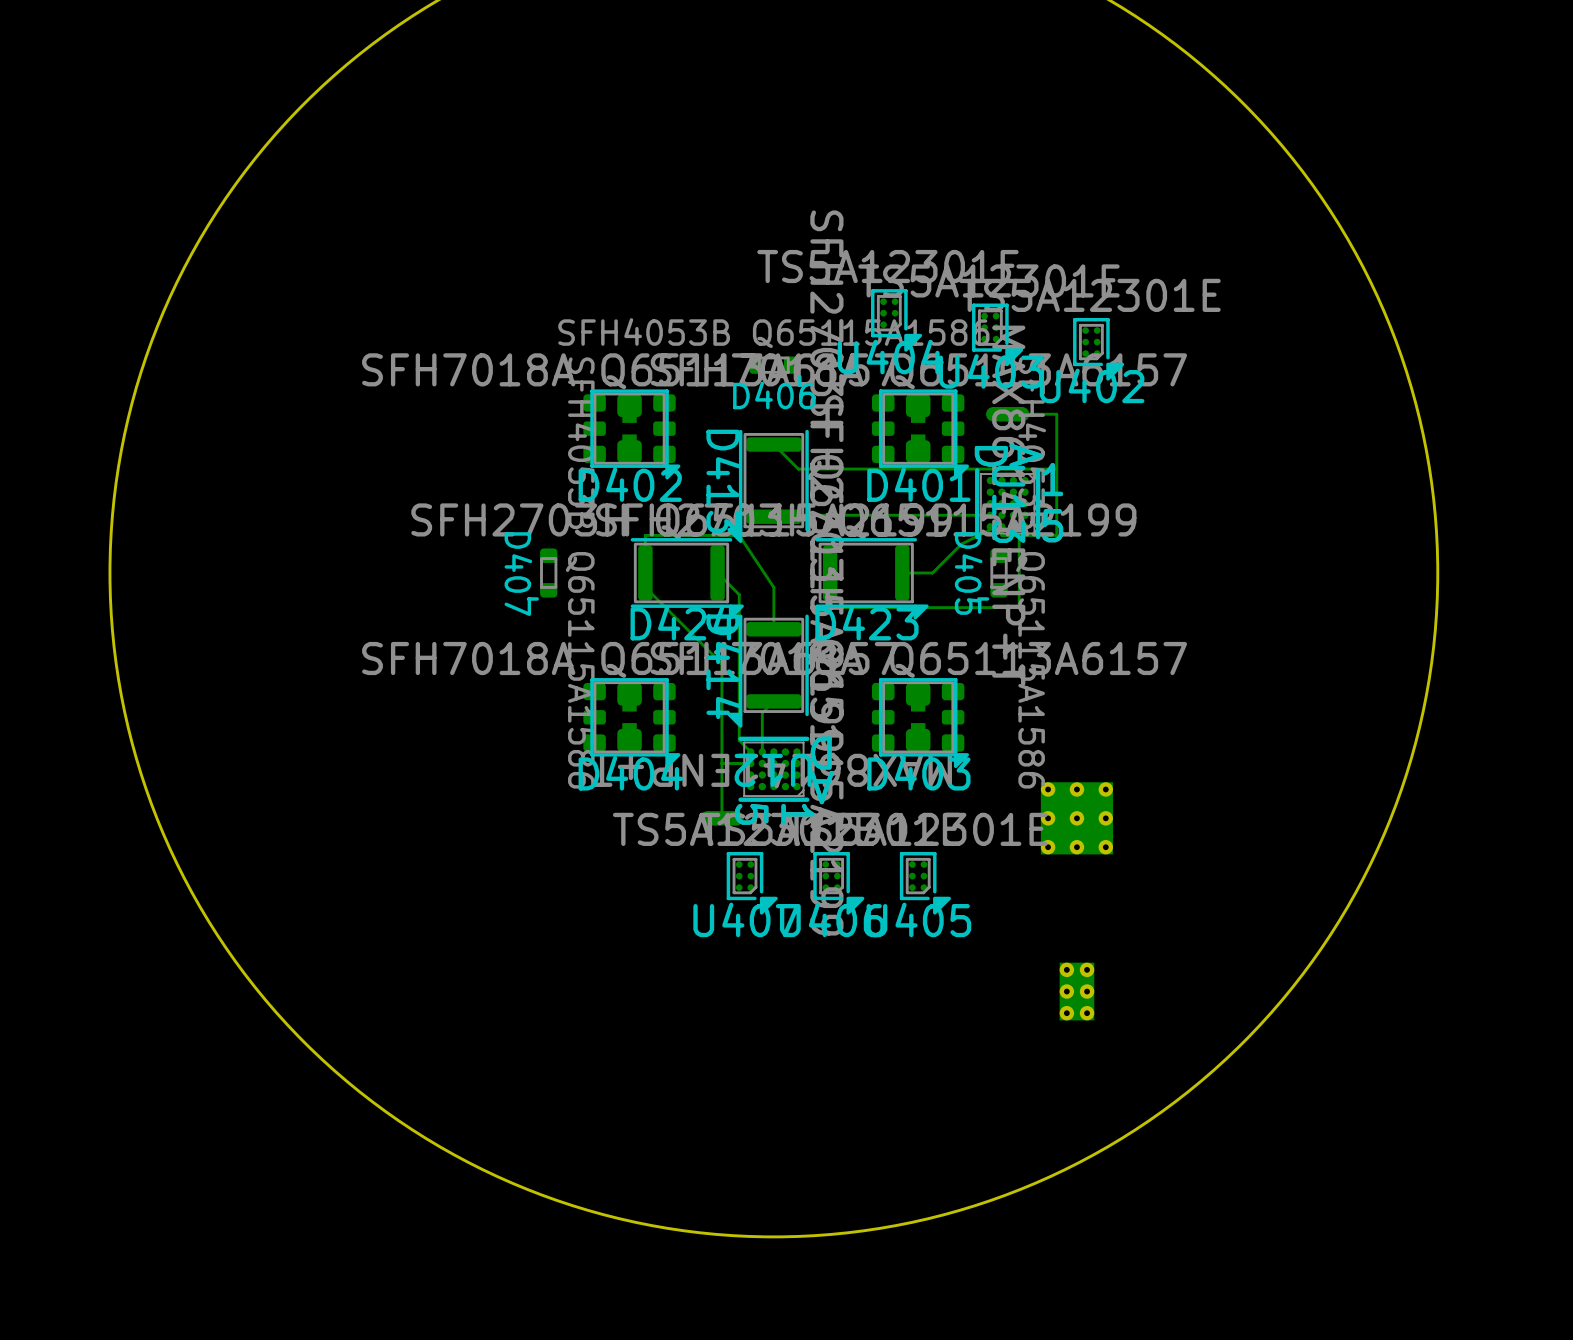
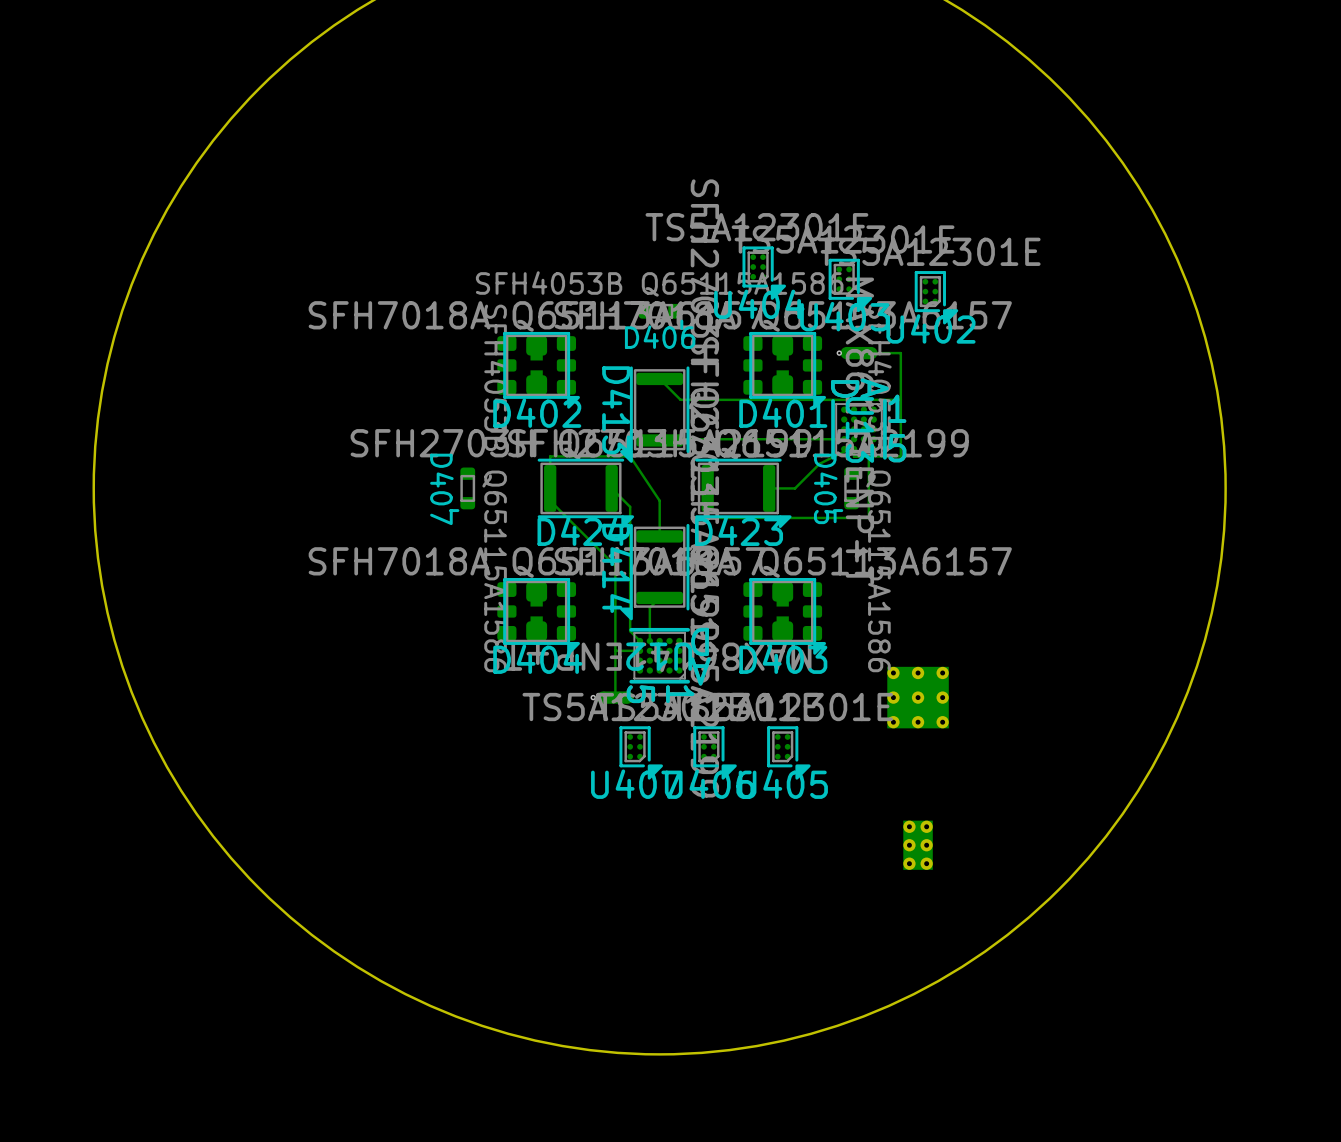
via: none -> (839, 353)
via: none -> (593, 697)

